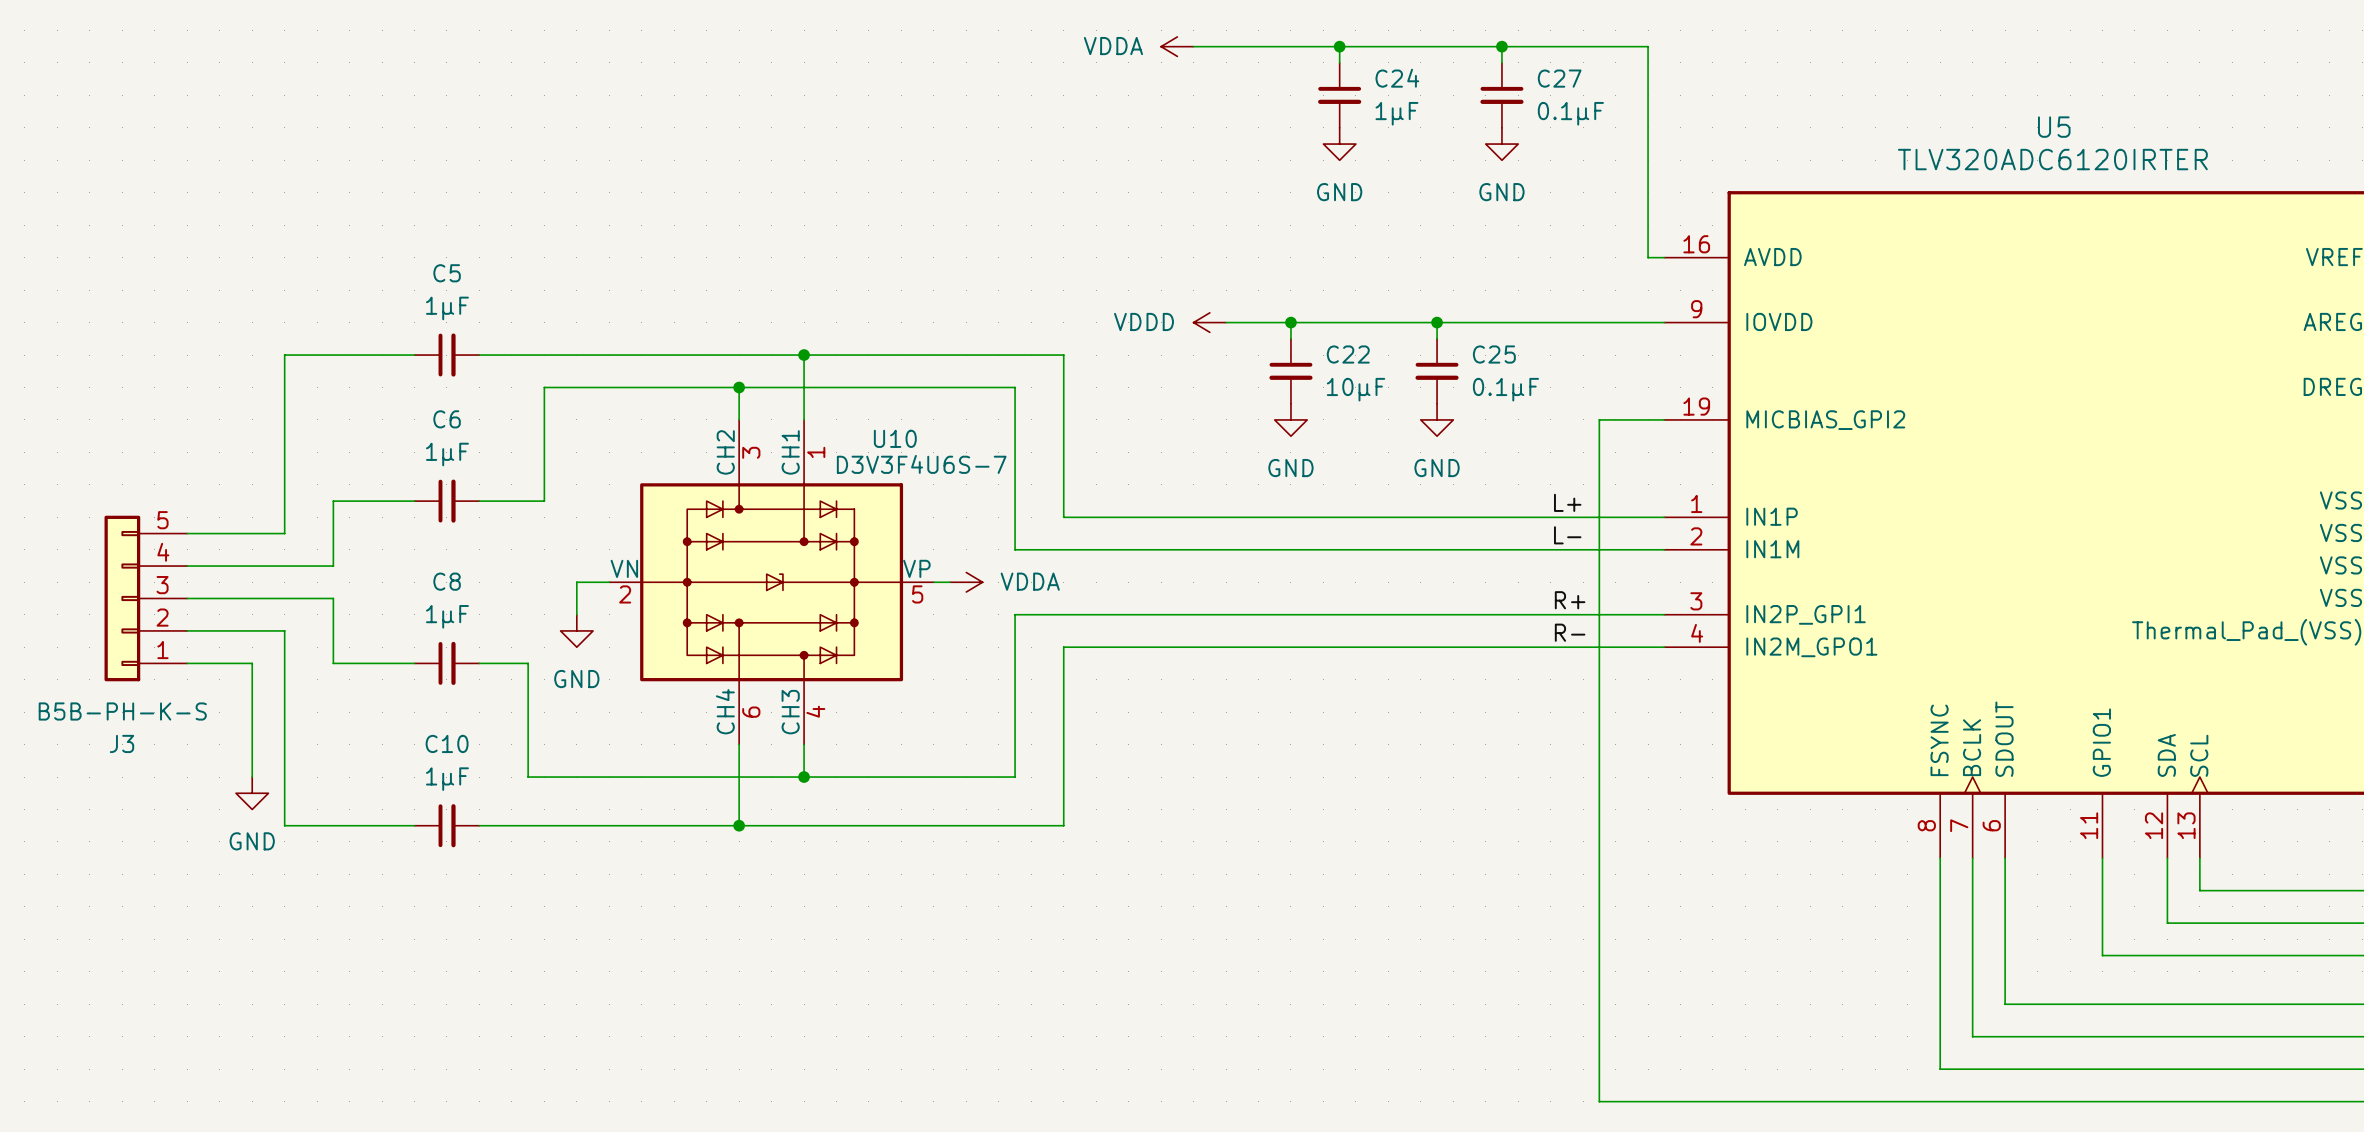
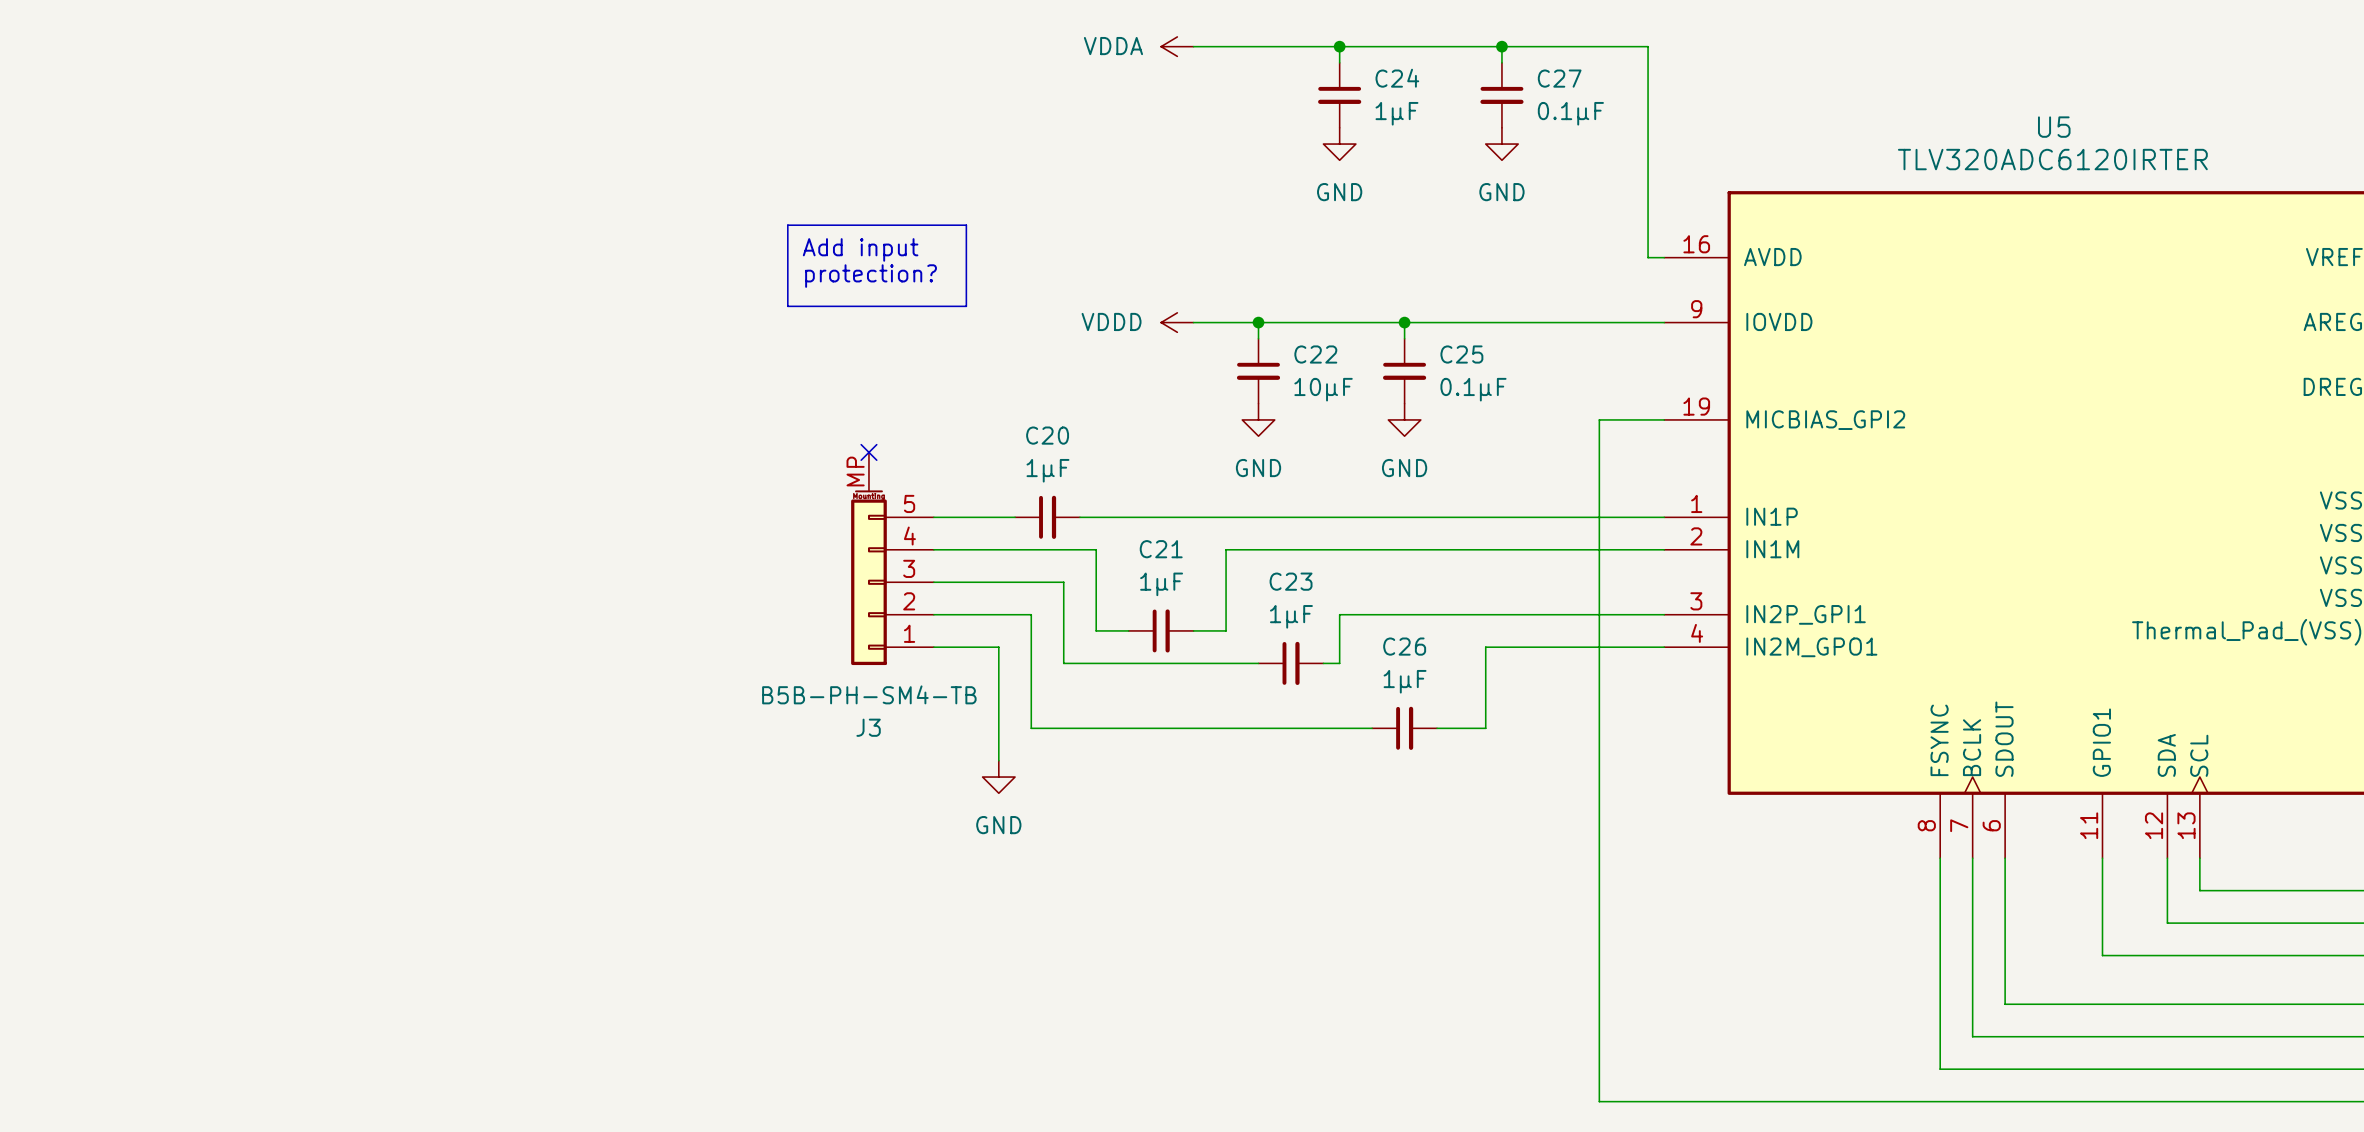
line: none -> (787, 225) (966, 225) (966, 306) (787, 306) (787, 225)
text: none -> Add input (860, 249)
text: none -> protection? (871, 276)
power symbol position: VDDD (1209, 322) -> VDDD (1177, 322)
wire: (1290, 322) (1290, 338) -> (1258, 322) (1258, 338)
junction position: (1290, 322) -> (1258, 322)
wire: (1437, 322) (1437, 338) -> (1404, 322) (1404, 338)
junction position: (1437, 322) -> (1404, 322)
wire: (414, 355) (284, 355) (284, 533) (187, 533) -> none
C5: 1µF (446, 355) -> none
wire: (479, 355) (1063, 355) (1063, 517) (1079, 517) -> none
wire: (804, 355) (804, 419) -> none
junction: (804, 355) -> none
C22 position: (1290, 371) -> (1258, 371)
C25 position: (1437, 371) -> (1404, 371)
wire: (739, 387) (739, 419) -> none
junction: (739, 387) -> none
power symbol position: GND (1290, 419) -> GND (1258, 419)
power symbol position: GND (1437, 419) -> GND (1404, 419)
no-connect mark: none -> (868, 452)
wire: (414, 501) (333, 501) (333, 566) (187, 566) -> none
C6: 1µF (446, 501) -> none
wire: (479, 501) (544, 501) (544, 387) (1015, 387) (1015, 549) -> (933, 549) (1015, 549)
label: L+ (1567, 502) -> none
J3 symbol: [104, 515, 188, 682] -> [851, 452, 934, 666]
wire: none -> (933, 517) (1015, 517)
C20: none -> 1µF (1047, 517)
label: L- (1567, 535) -> none
wire: (1096, 549) (1226, 549) -> (1096, 549) (1096, 630) (1128, 630)
wire: none -> (1226, 549) (1226, 630) (1193, 630)
wire: (609, 582) (576, 582) (576, 614) -> none
U10: D3V3F4U6S-7 (771, 582) -> none
wire: none -> (950, 582) (1063, 582) (1063, 647)
power symbol: VDDA (966, 582) -> none
wire: (187, 598) (333, 598) (333, 663) (414, 663) -> none
label: R+ (1570, 600) -> none
wire: (1015, 614) (1015, 777) (528, 777) (528, 663) (479, 663) -> (1015, 614) (933, 614)
wire: (1031, 614) (1339, 614) -> (1031, 614) (1031, 728) (1372, 728)
wire: none -> (1339, 614) (1339, 663) (1323, 663)
wire: (187, 630) (284, 630) (284, 825) (414, 825) -> none
power symbol: GND (576, 630) -> none
C21: none -> 1µF (1161, 630)
label: R- (1570, 632) -> none
wire: none -> (933, 647) (998, 647) (998, 760)
wire: (1063, 647) (1485, 647) -> (1437, 728) (1485, 728) (1485, 647)
wire: (187, 663) (252, 663) (252, 777) -> none
C8: 1µF (446, 663) -> none
wire: (1063, 663) (1063, 825) (479, 825) -> (1063, 663) (1258, 663)
C23: none -> 1µF (1290, 663)
J3 value: B5B-PH-K-S (122, 711) -> B5B-PH-SM4-TB (869, 694)
C26: none -> 1µF (1404, 728)
wire: (739, 744) (739, 825) -> none
wire: (804, 744) (804, 777) -> none
junction: (804, 777) -> none
power symbol: none -> GND (998, 777)
power symbol: GND (252, 793) -> none
C10: 1µF (446, 825) -> none
junction: (739, 825) -> none

